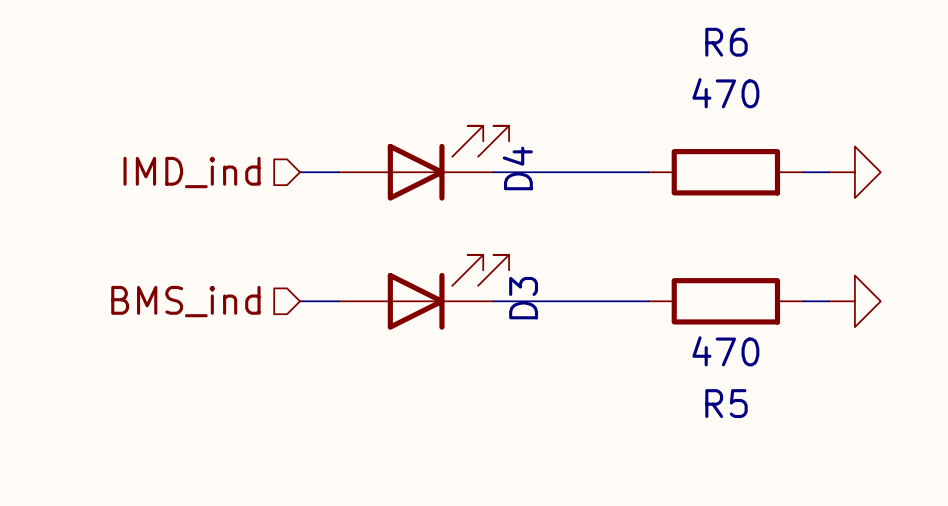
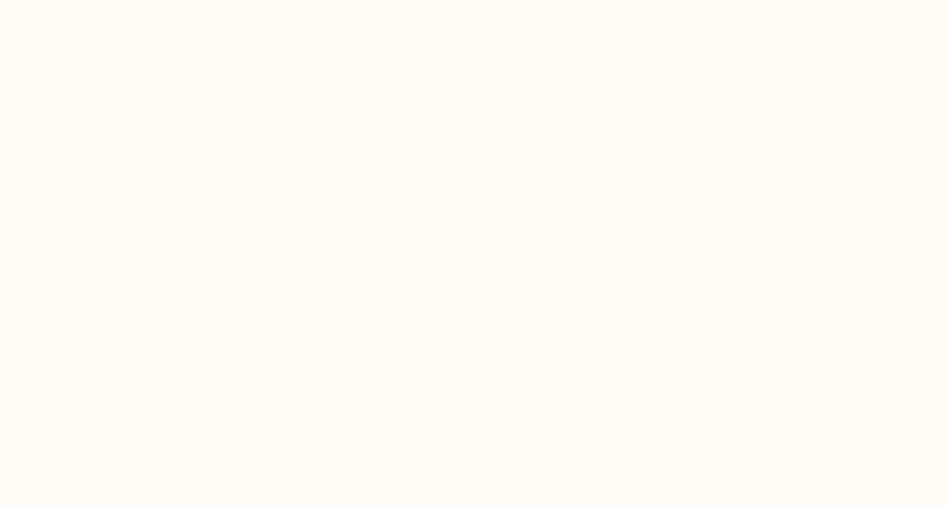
D4: (423, 163) -> none
hierarchical label: IMD_ind (192, 172) -> none
wire: (299, 172) (338, 172) -> none
wire: (493, 172) (648, 172) -> none
R6: 470 (725, 172) -> none
wire: (803, 172) (829, 172) -> none
power symbol: (854, 172) -> none
D3: (423, 292) -> none
hierarchical label: BMS_ind (185, 301) -> none
wire: (299, 301) (338, 301) -> none
wire: (493, 301) (648, 301) -> none
R5: 470 (725, 301) -> none
wire: (803, 301) (829, 301) -> none
power symbol: (854, 301) -> none

